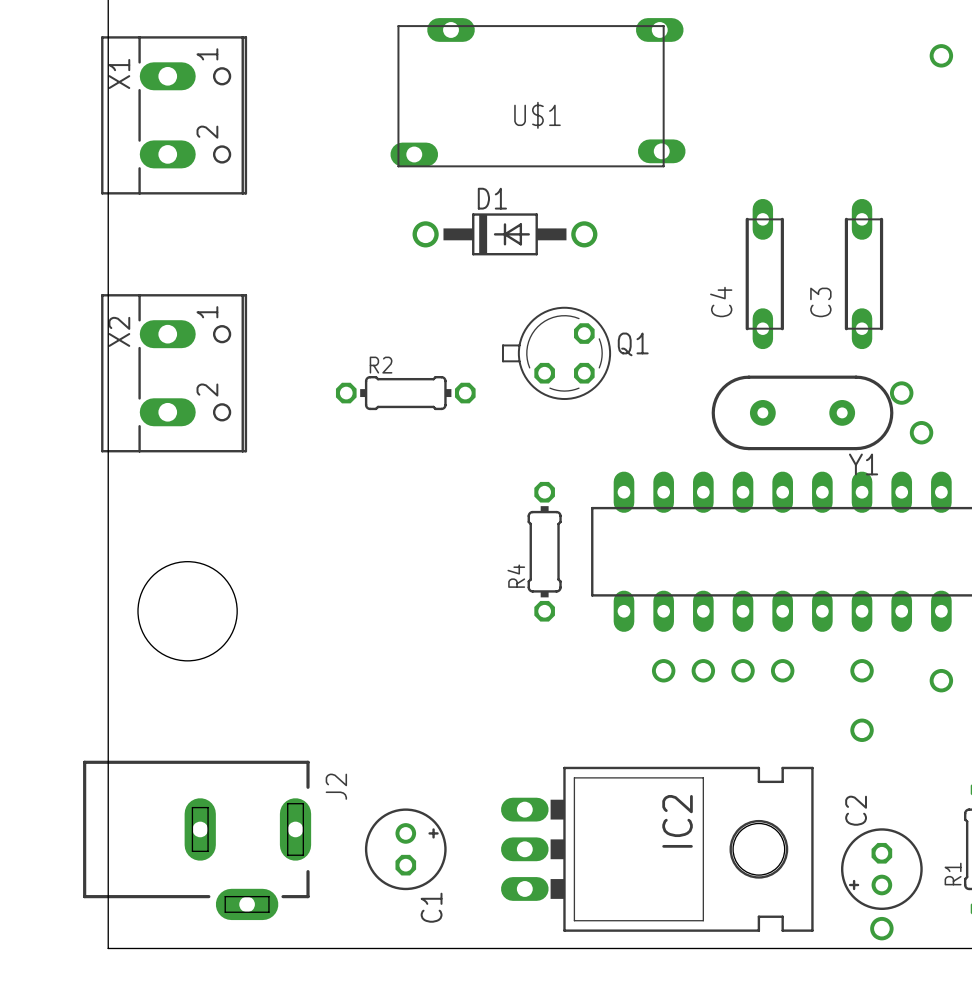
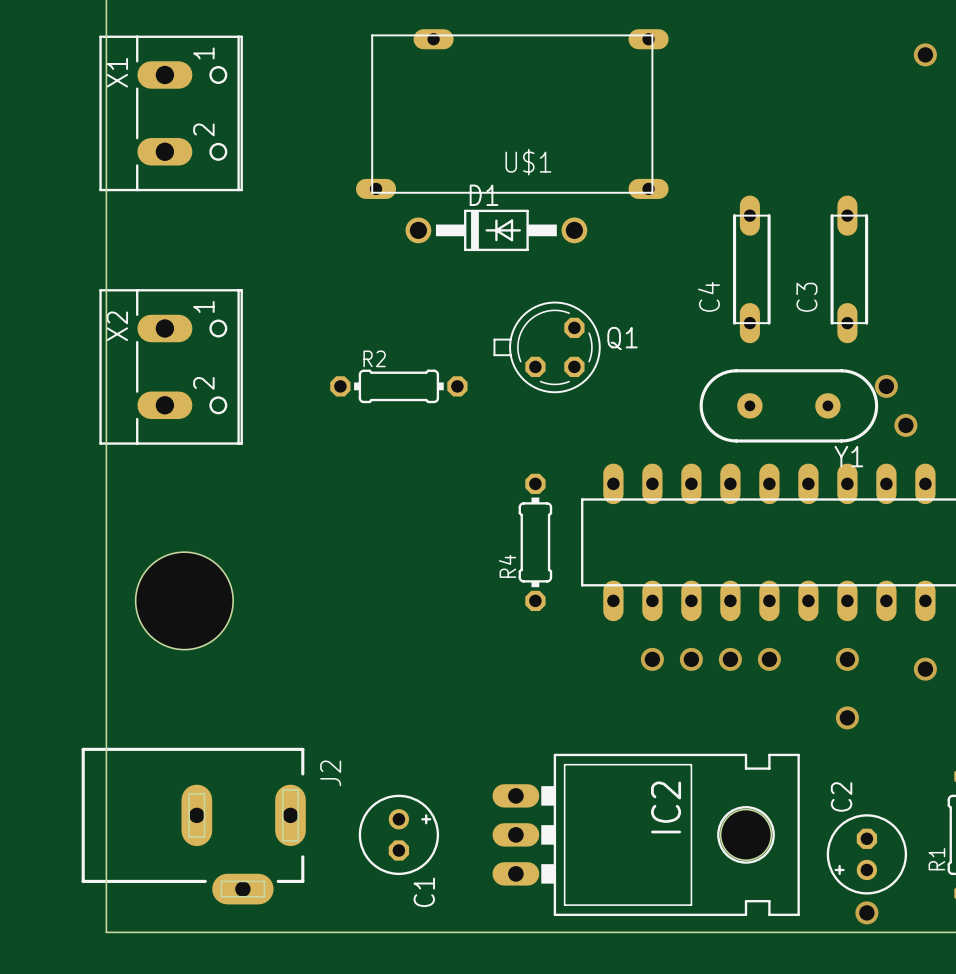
U$1 footprint: [390, 18, 686, 168] -> [355, 29, 669, 199]

